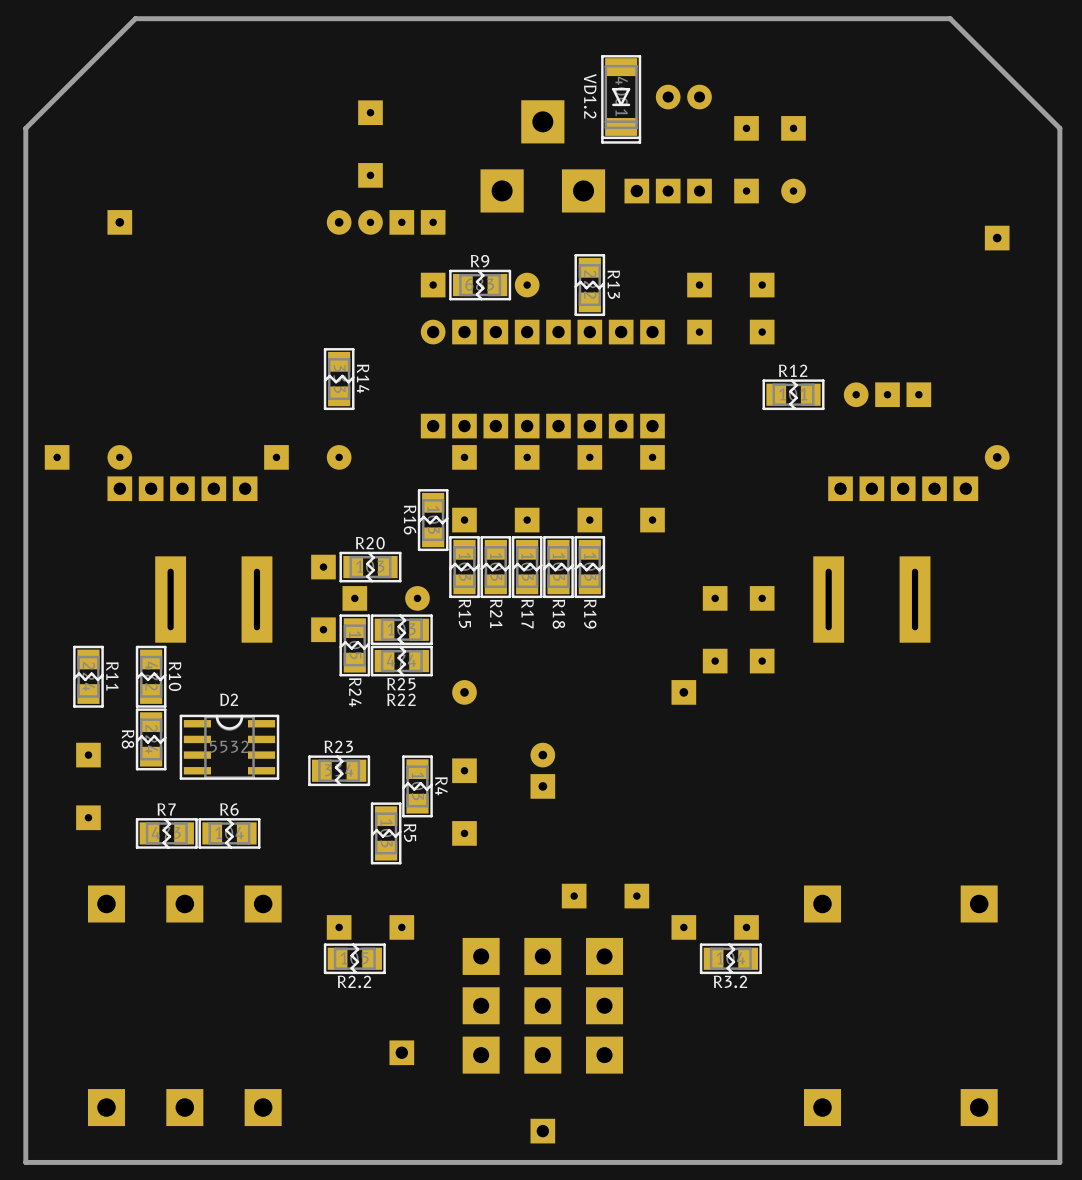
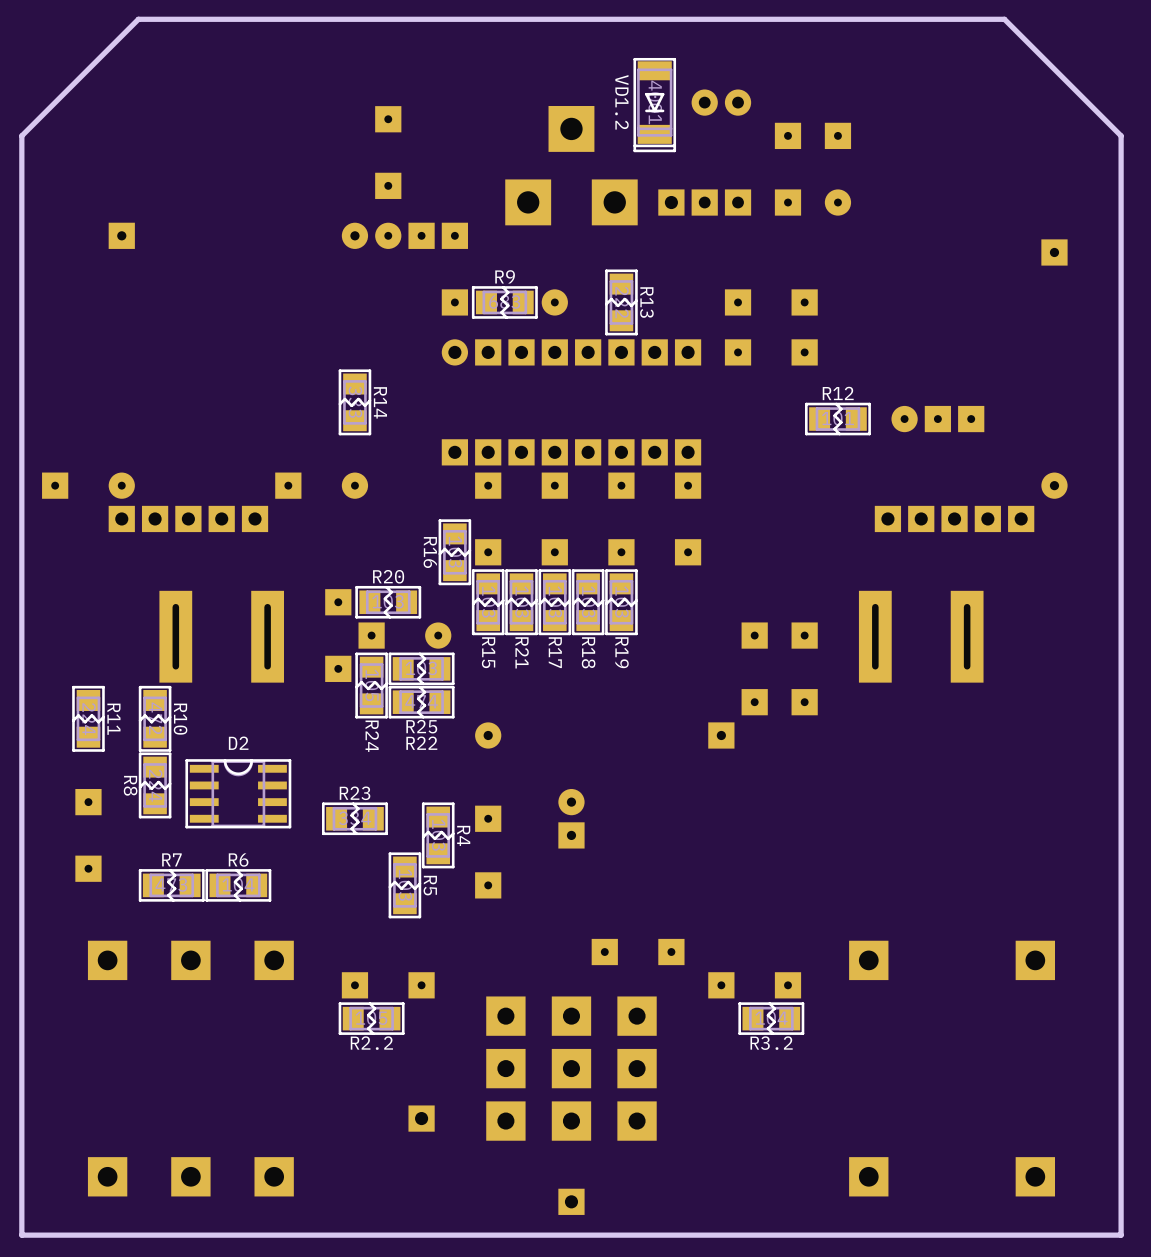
D2 value: 5532 (229, 746) -> none

